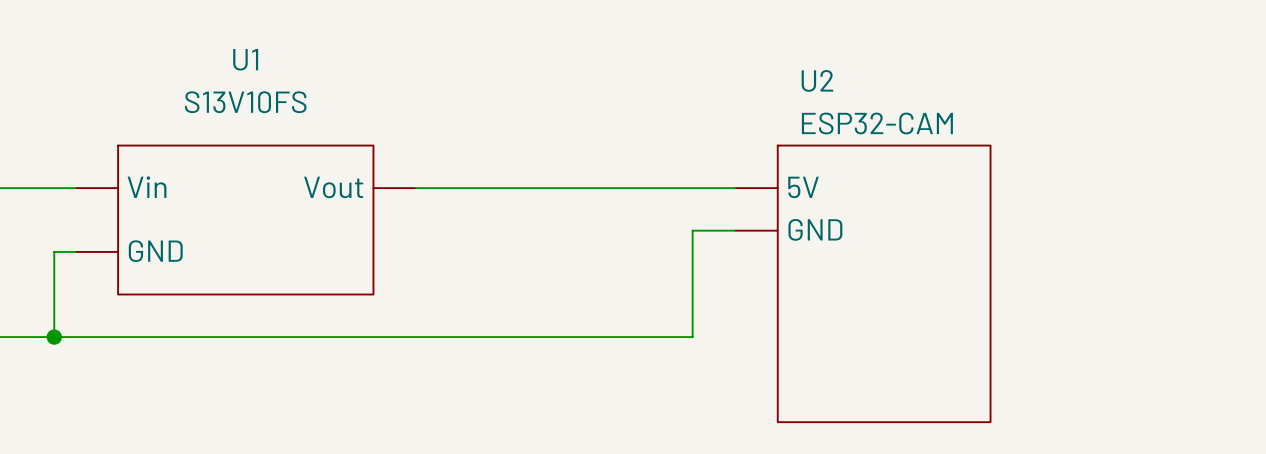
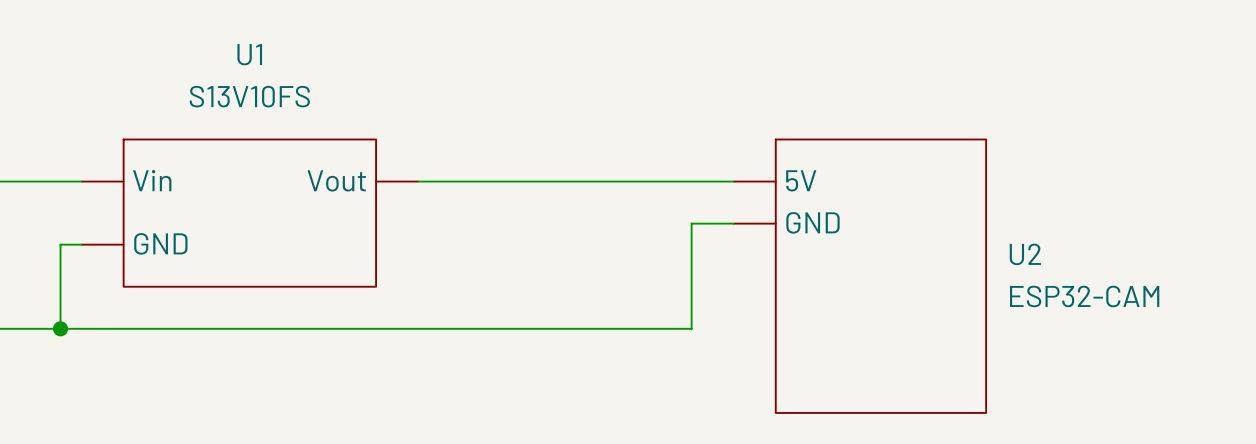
U2 name position: U2 (817, 80) -> U2 (1025, 254)
U2 value position: ESP32-CAM (877, 123) -> ESP32-CAM (1084, 296)

